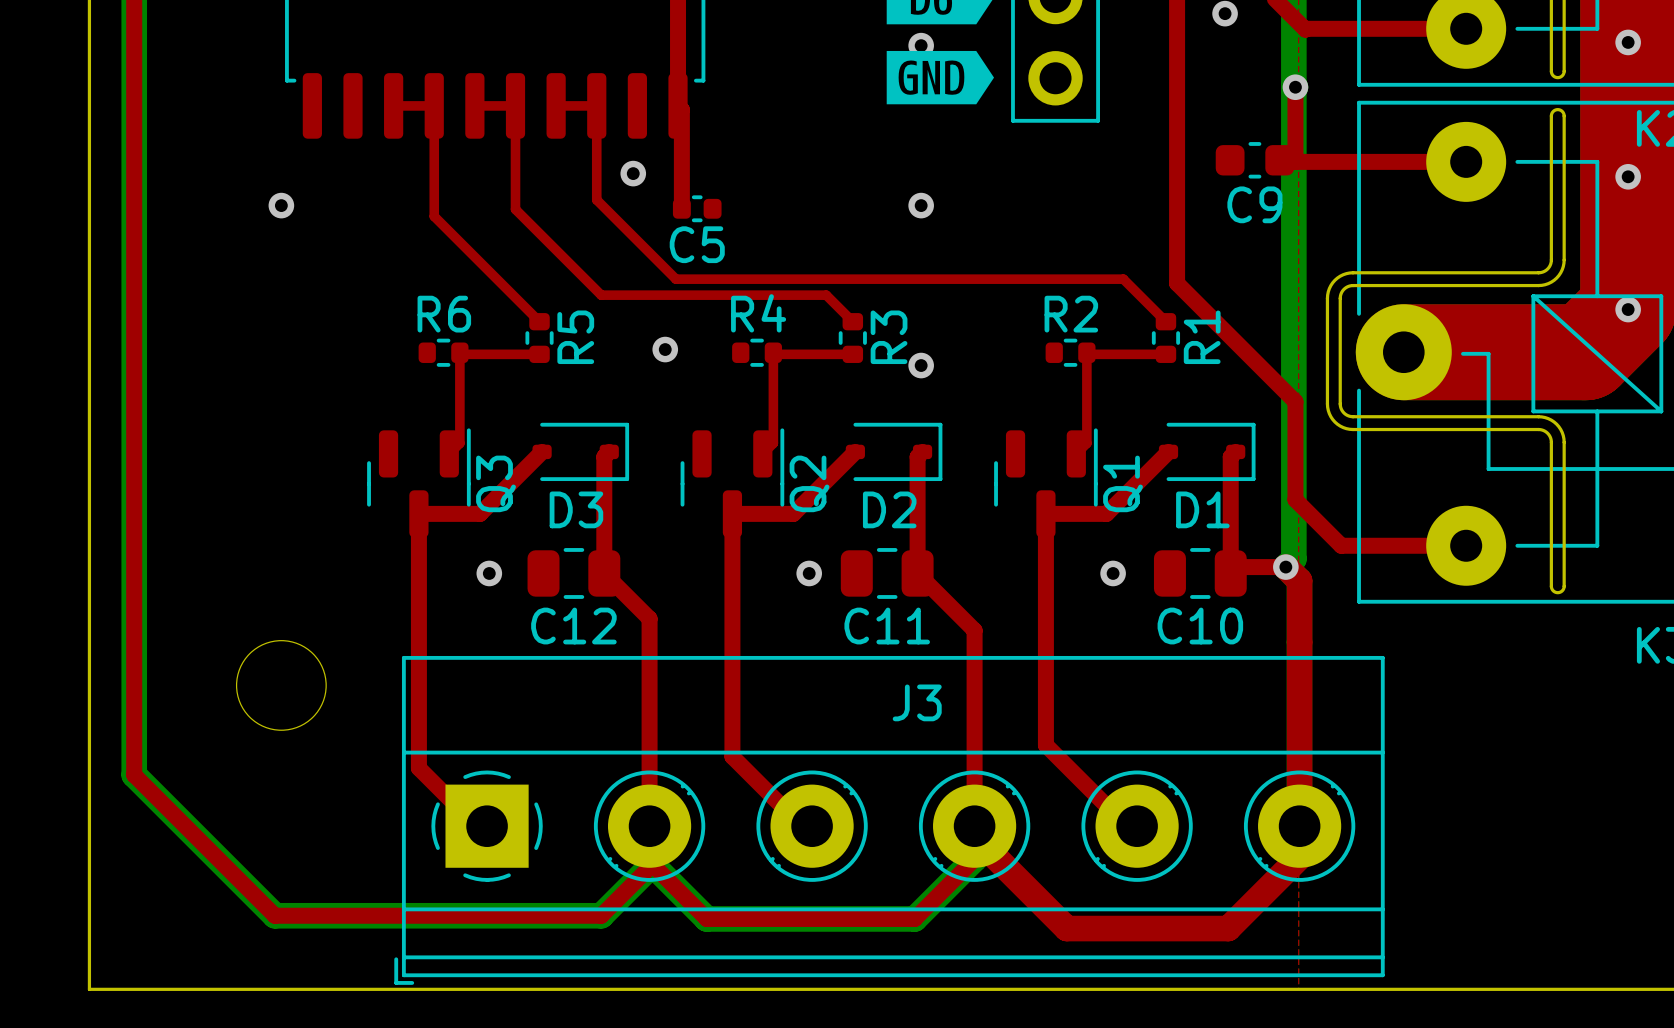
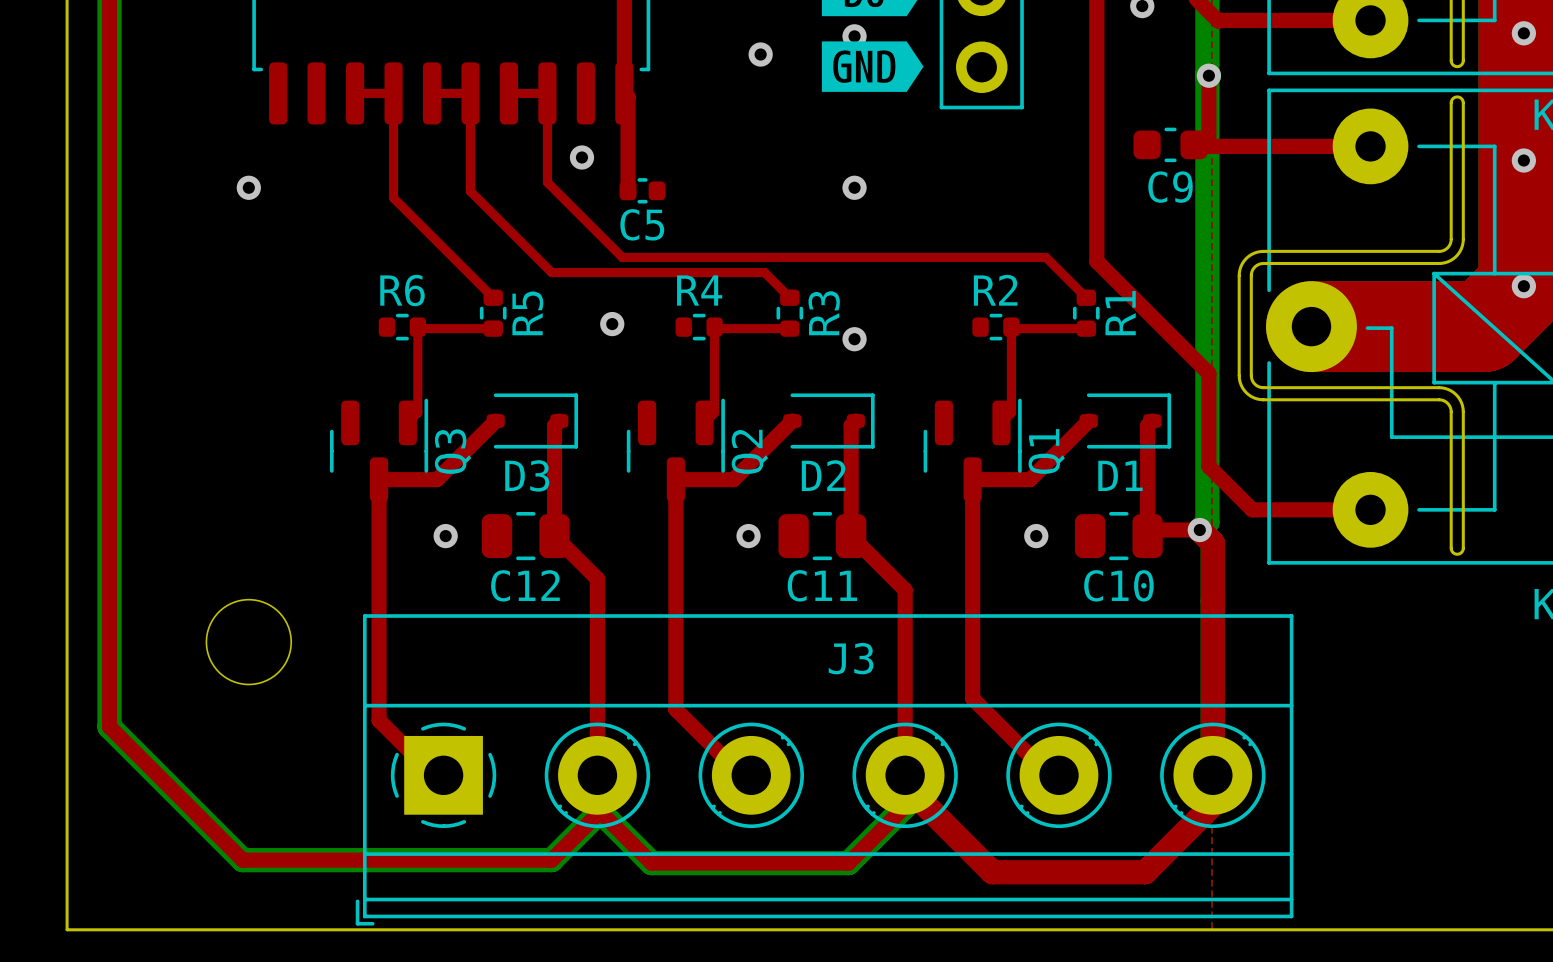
via: none -> (760, 54)

